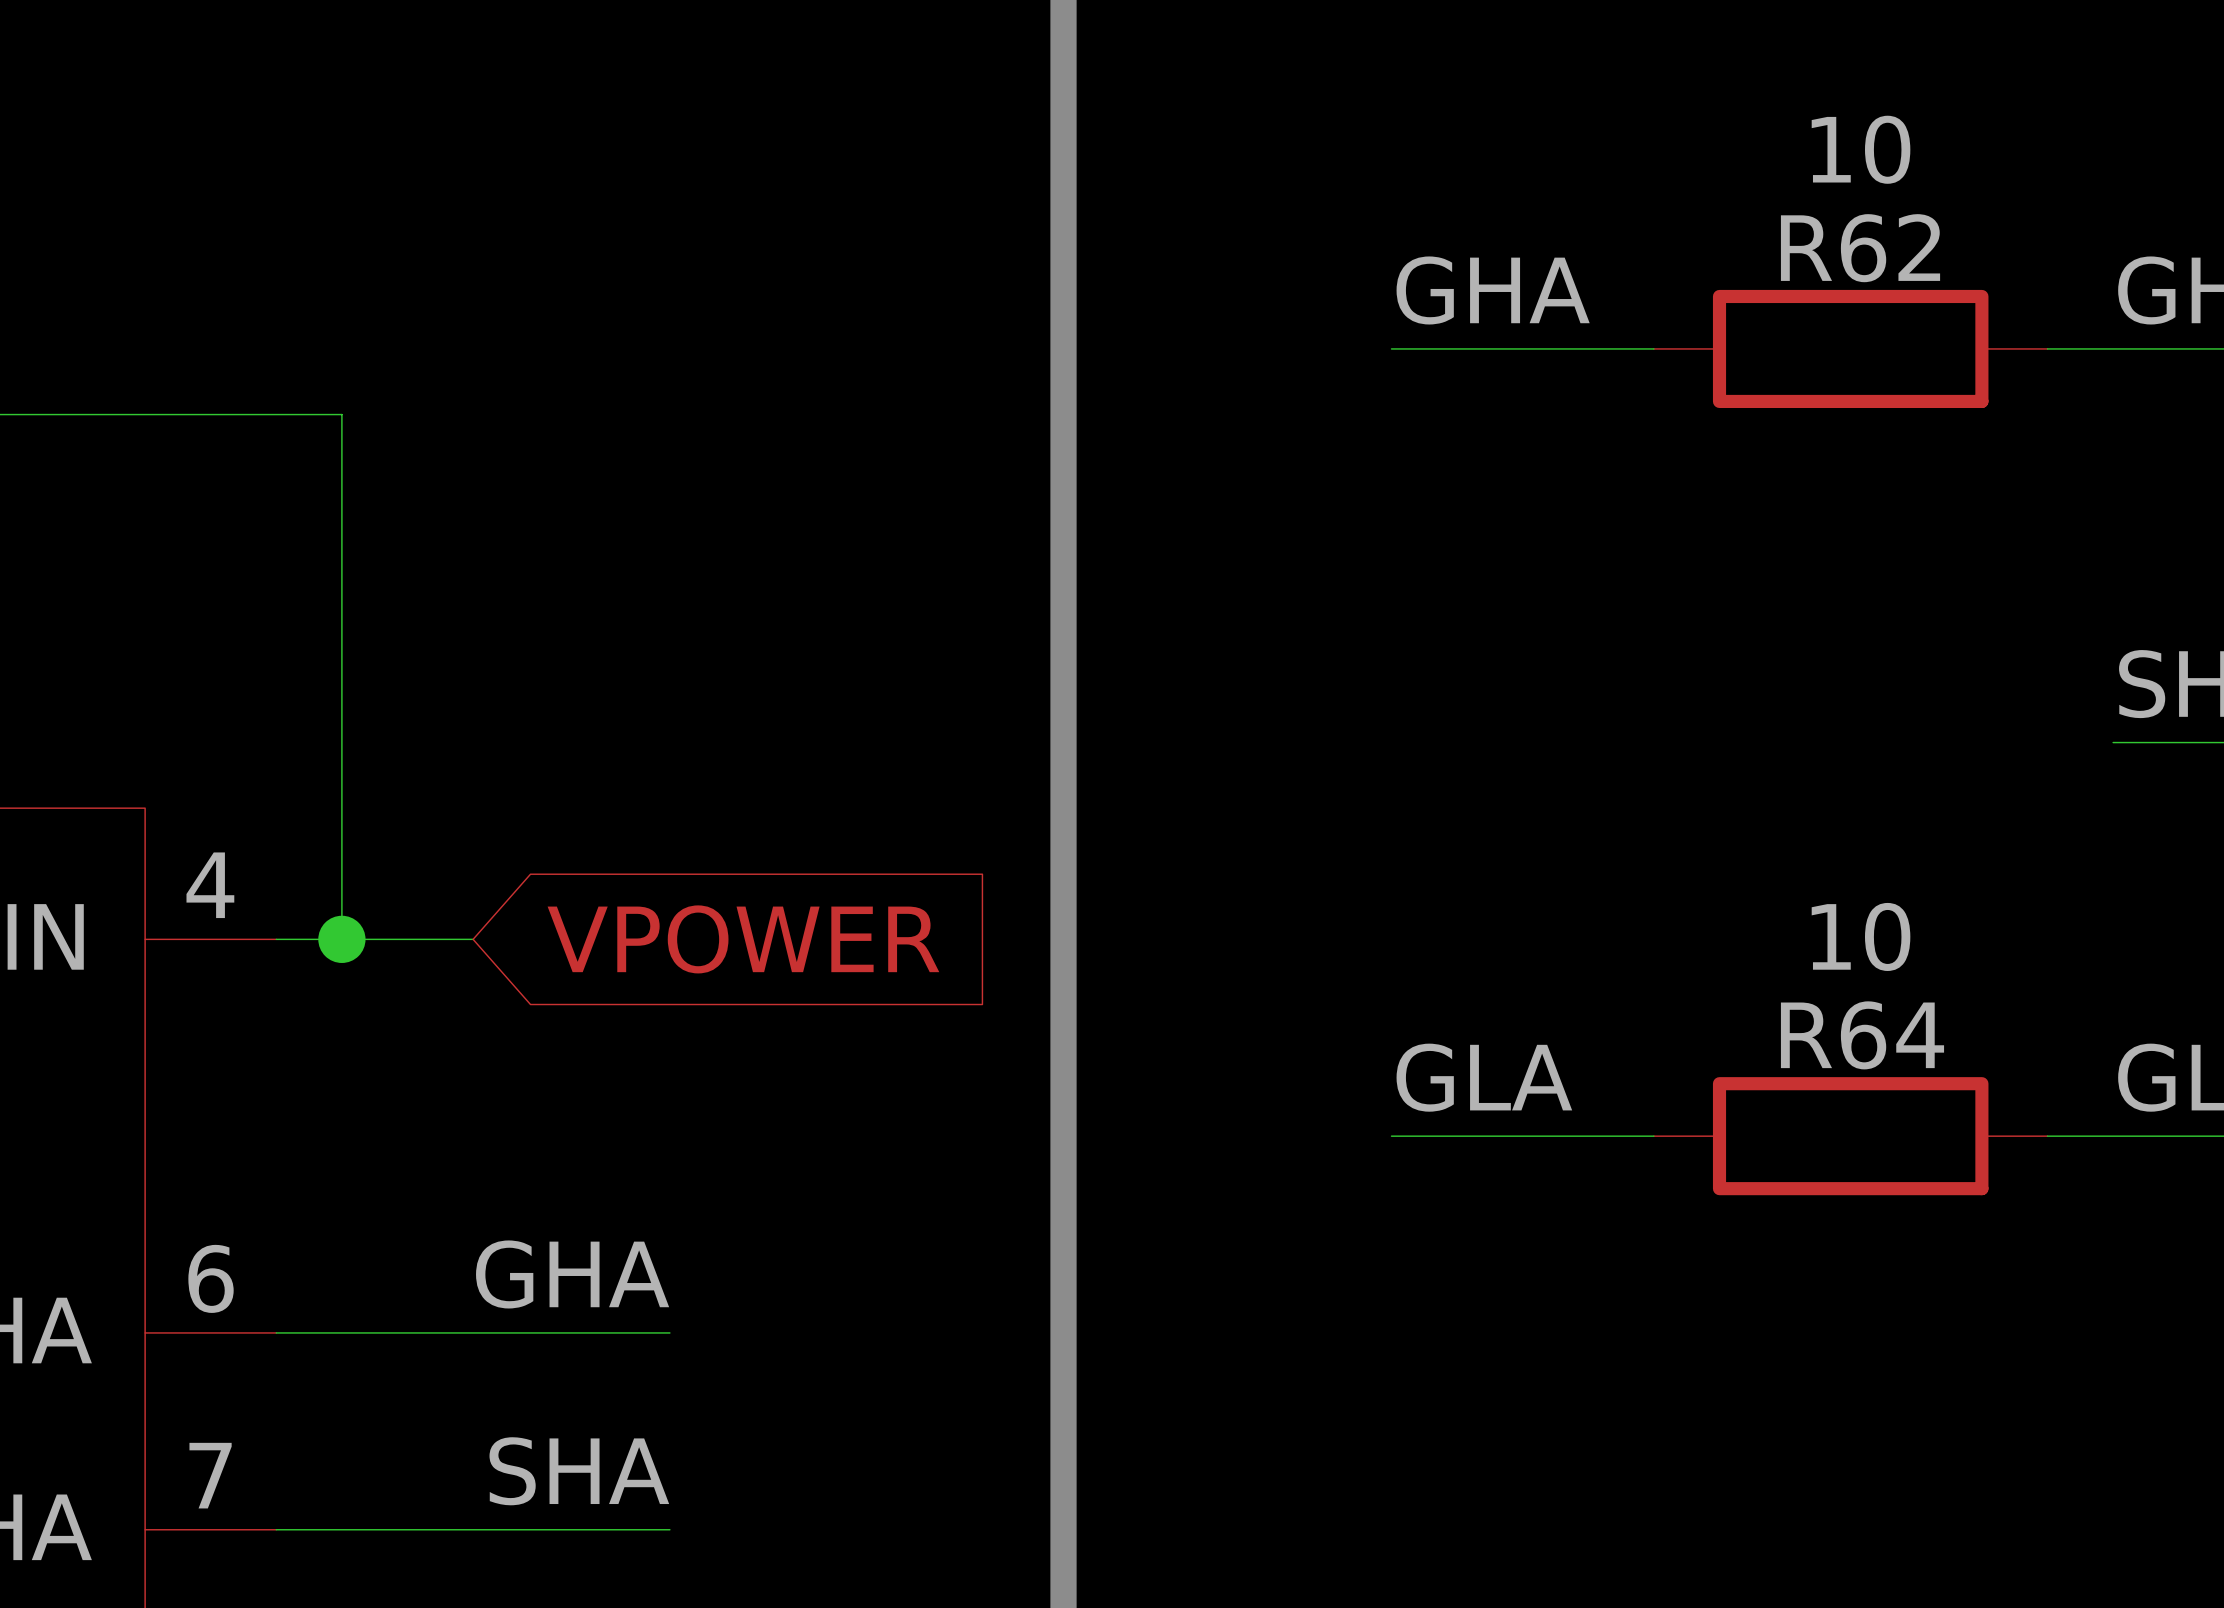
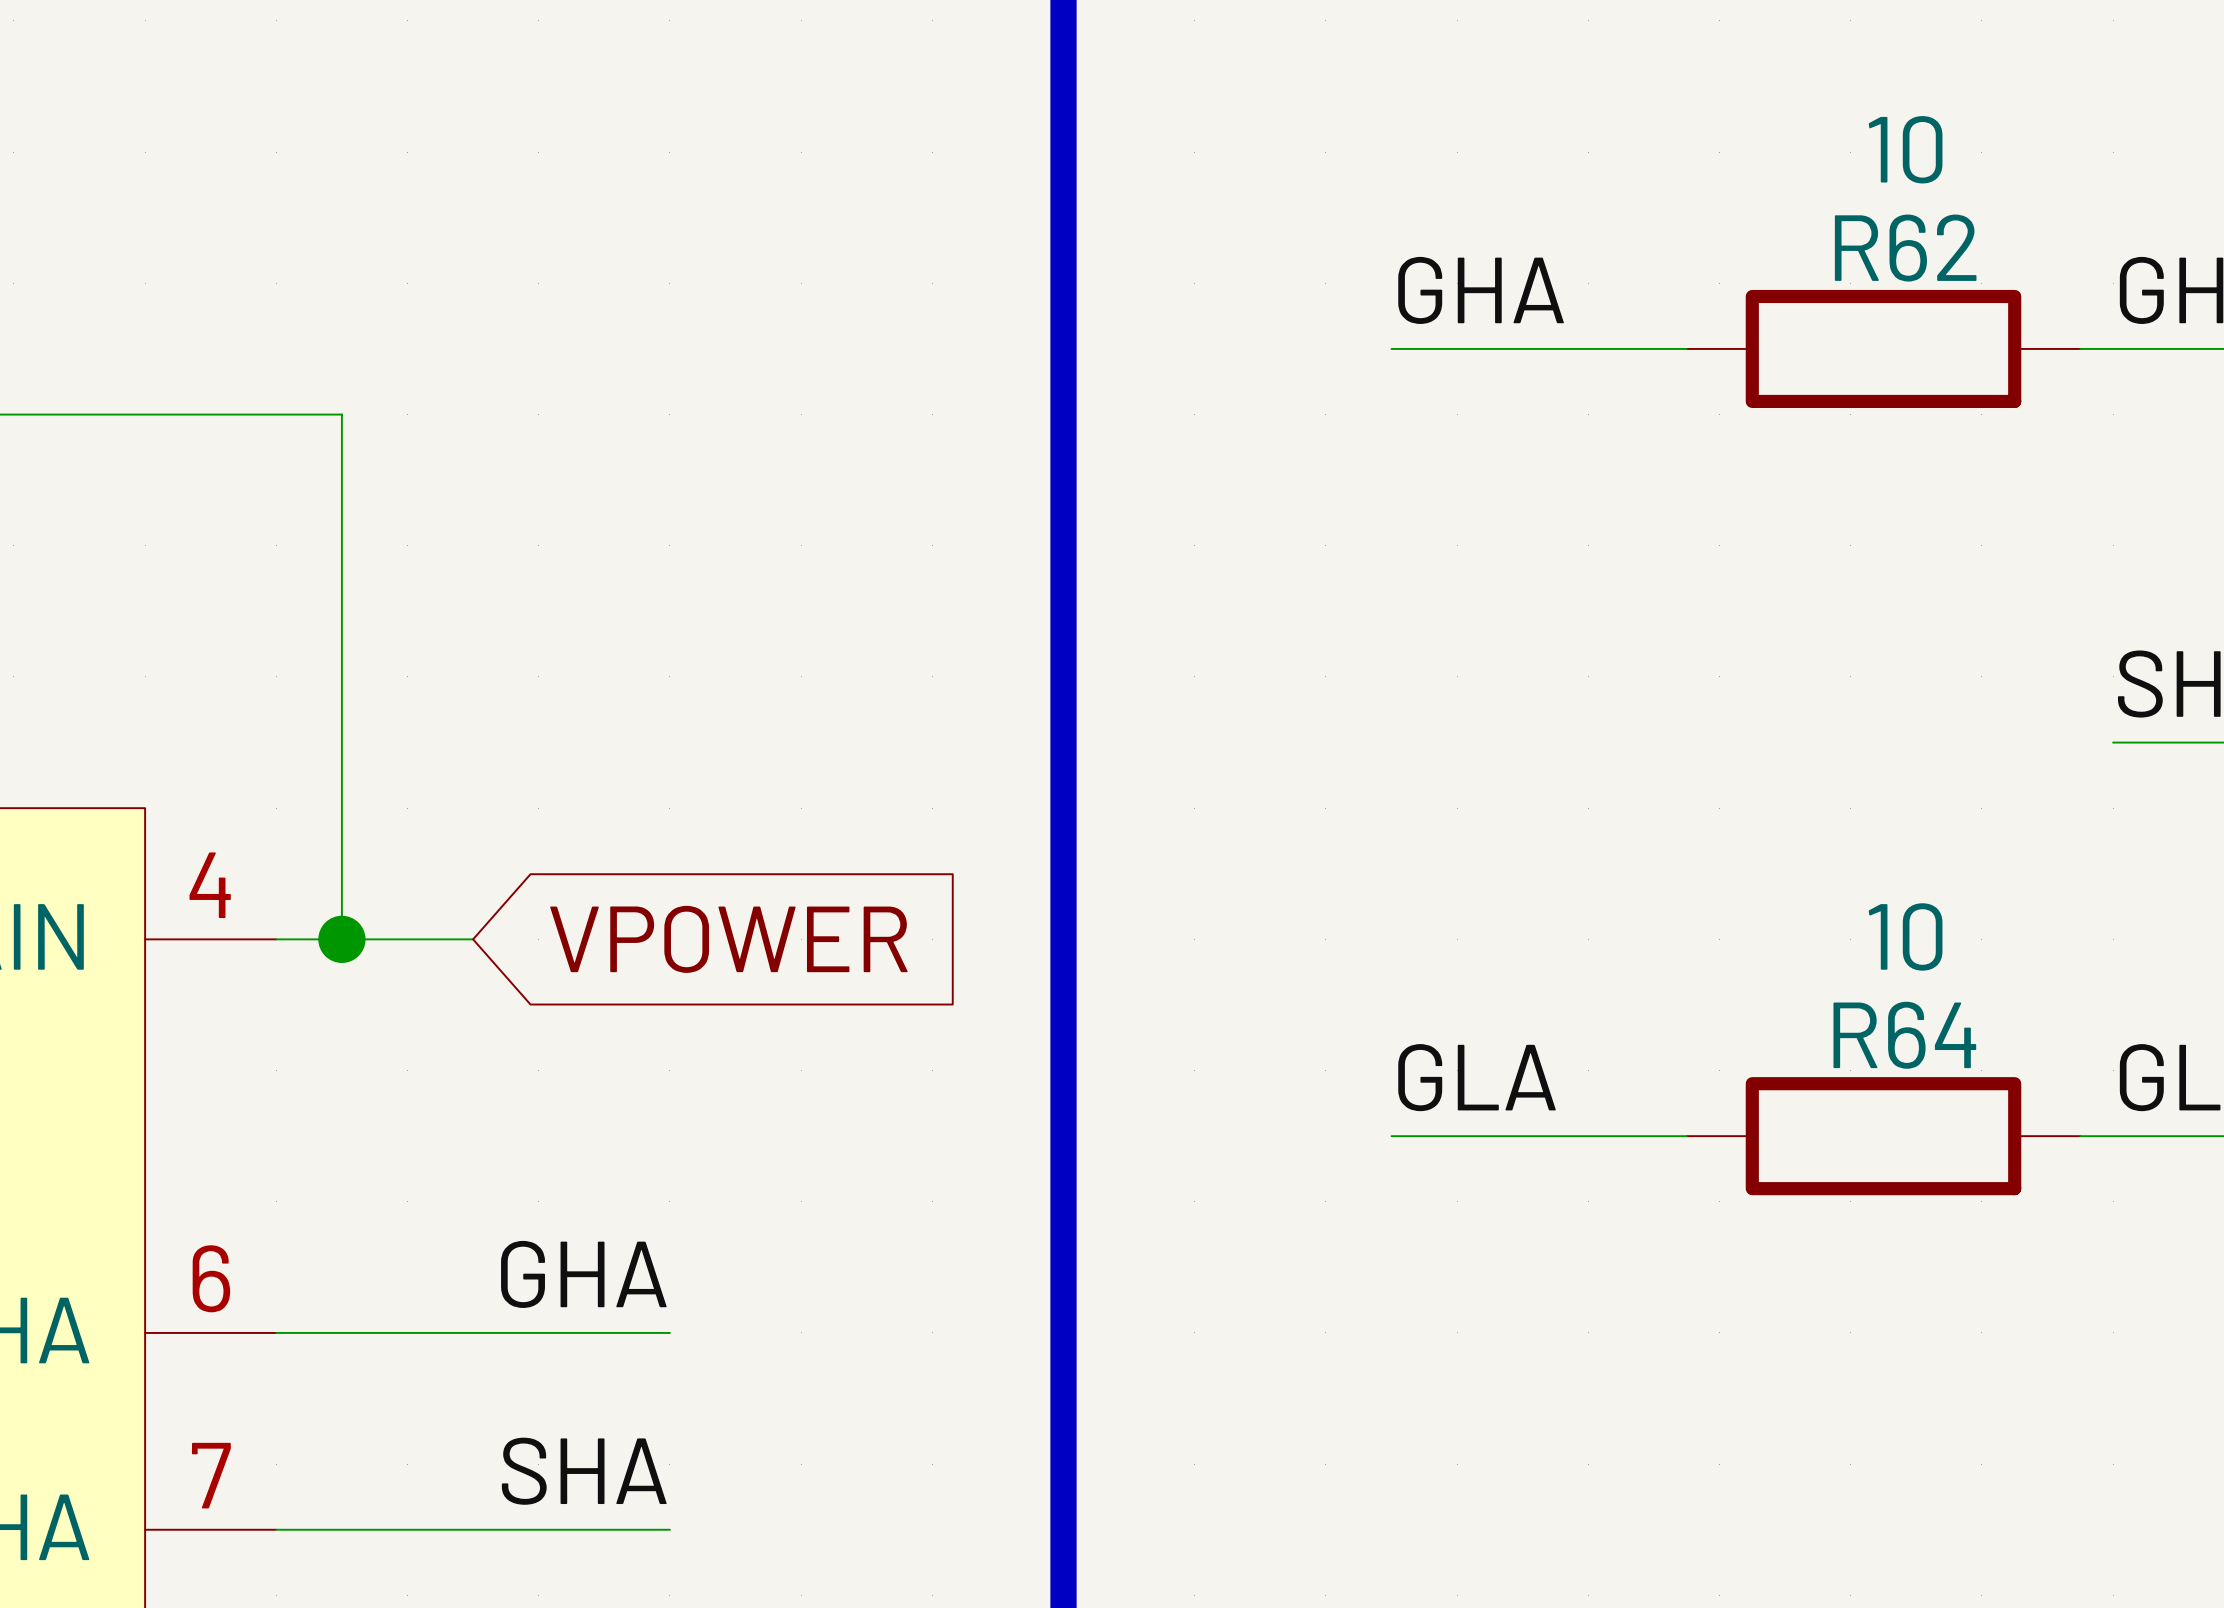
R62 position: (1850, 348) -> (1883, 348)
R64 position: (1850, 1136) -> (1883, 1136)

